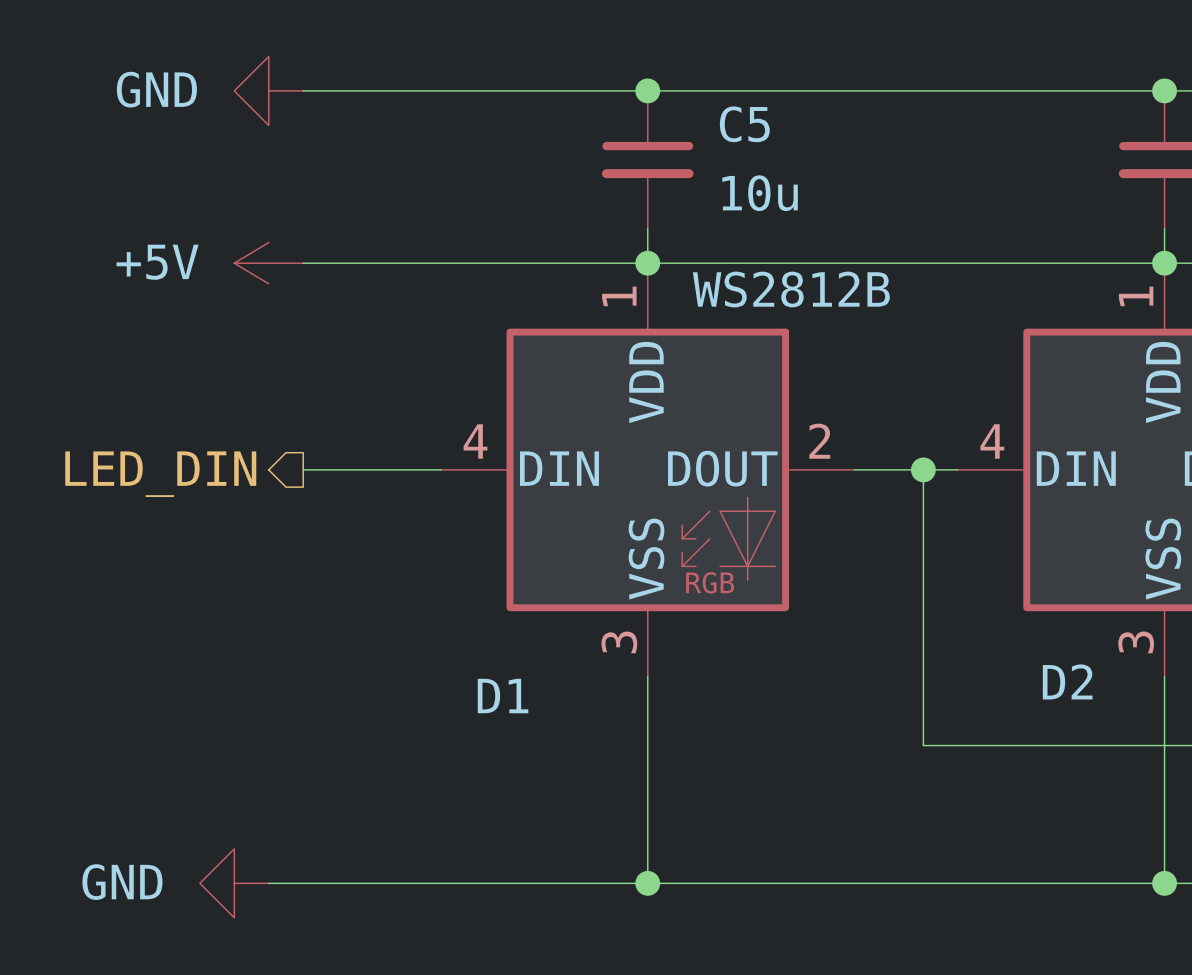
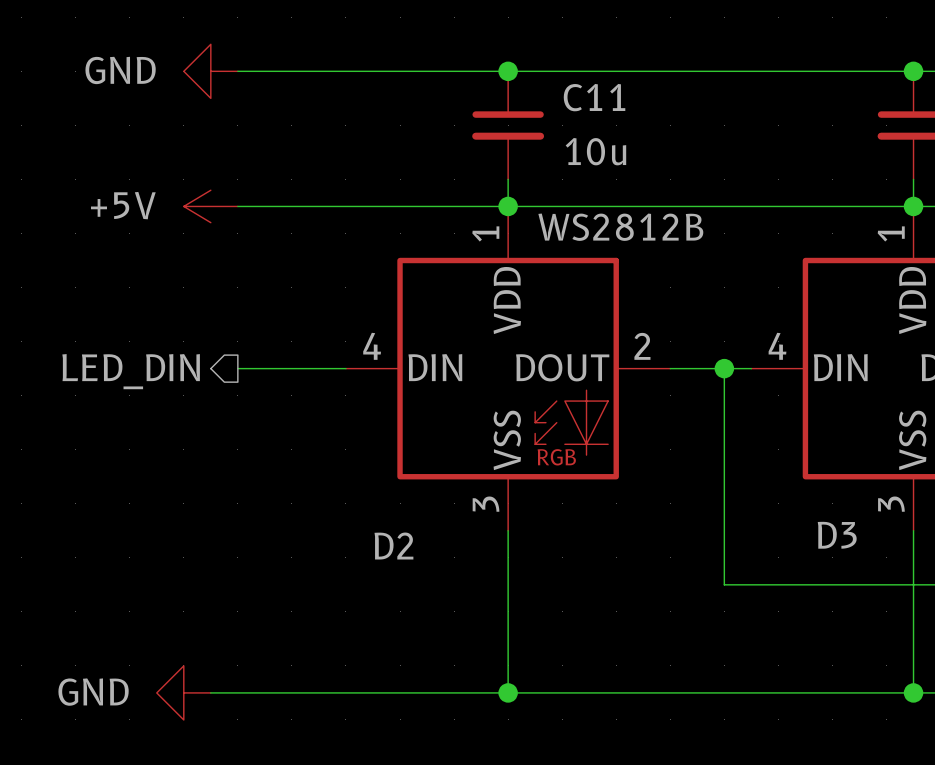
C5 name: C5 (744, 124) -> C11 (594, 97)
D2 name: D2 (1067, 681) -> D3 (837, 535)
D1 name: D1 (503, 696) -> D2 (393, 546)

